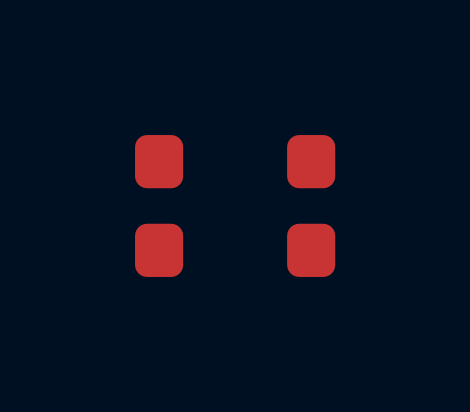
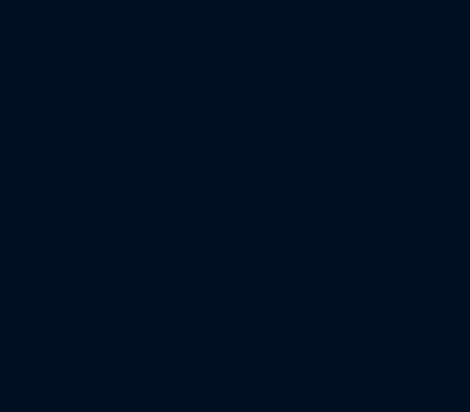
part: (159, 205) -> none
part: (311, 205) -> none

